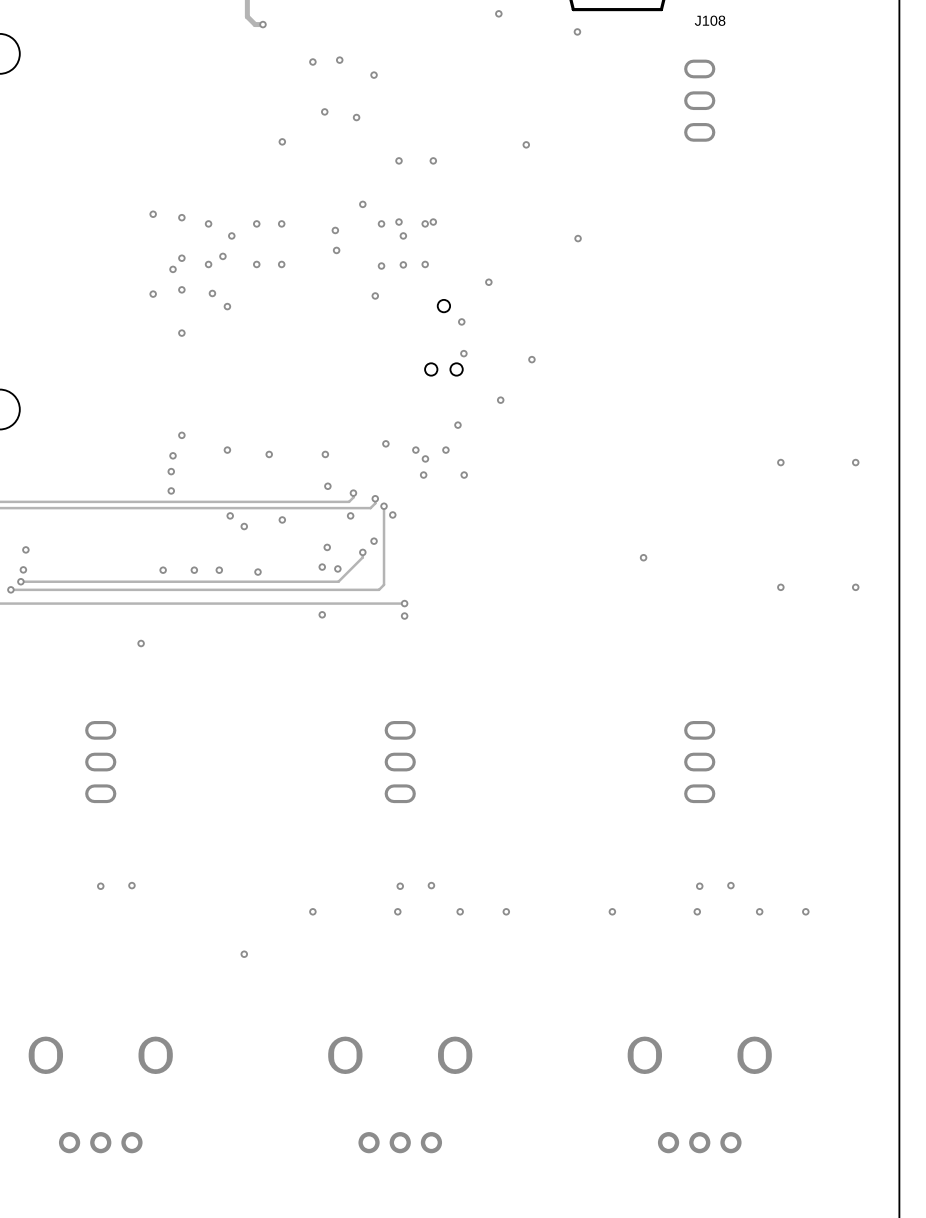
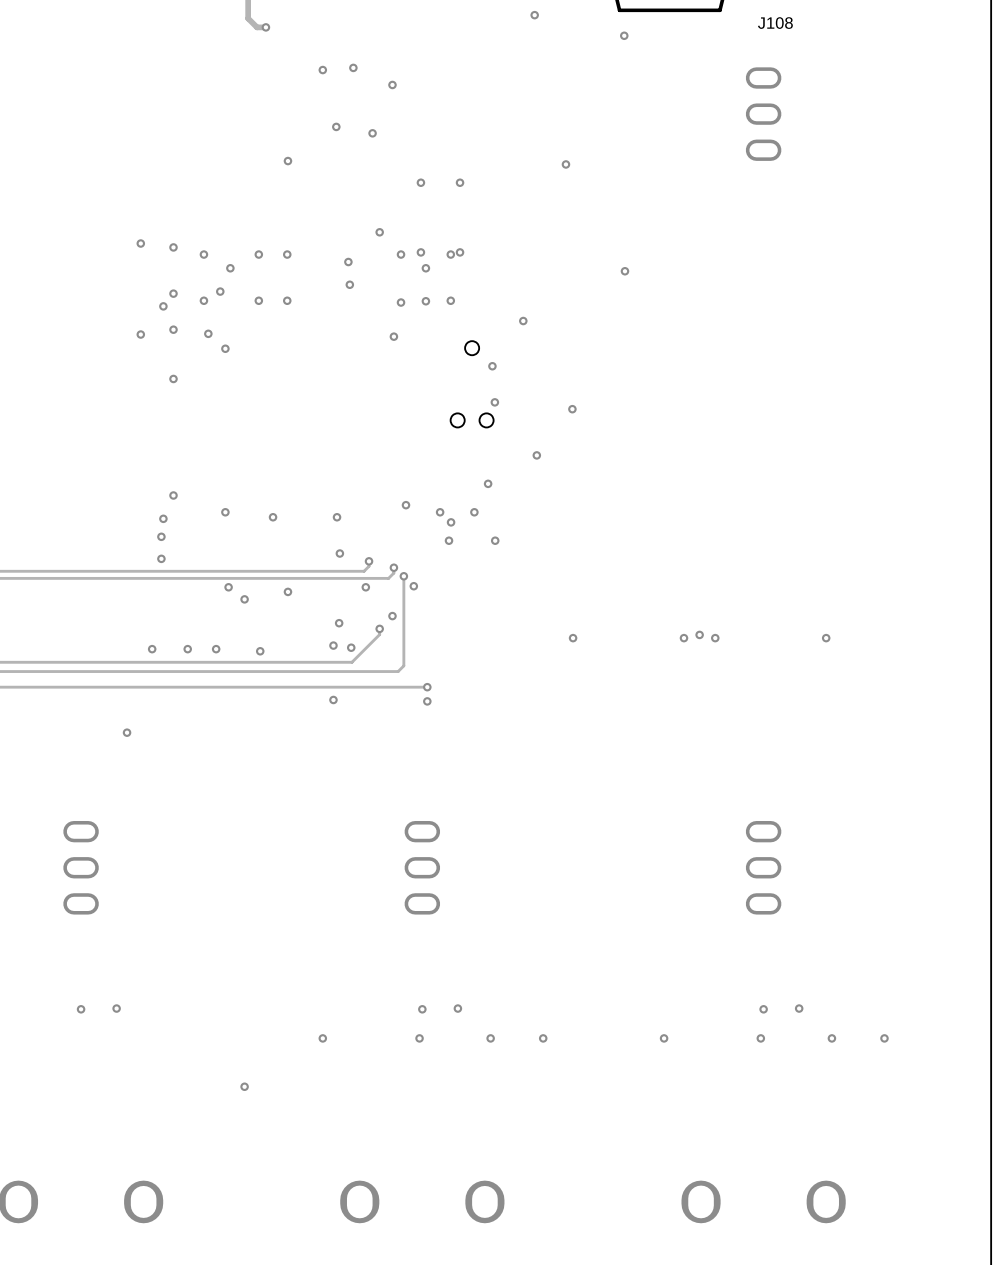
via: (780, 462) -> none
via: (855, 462) -> none
via: none -> (573, 638)
via: none -> (683, 638)
via: none -> (715, 638)
via position: (780, 587) -> (826, 638)
via: (855, 587) -> none

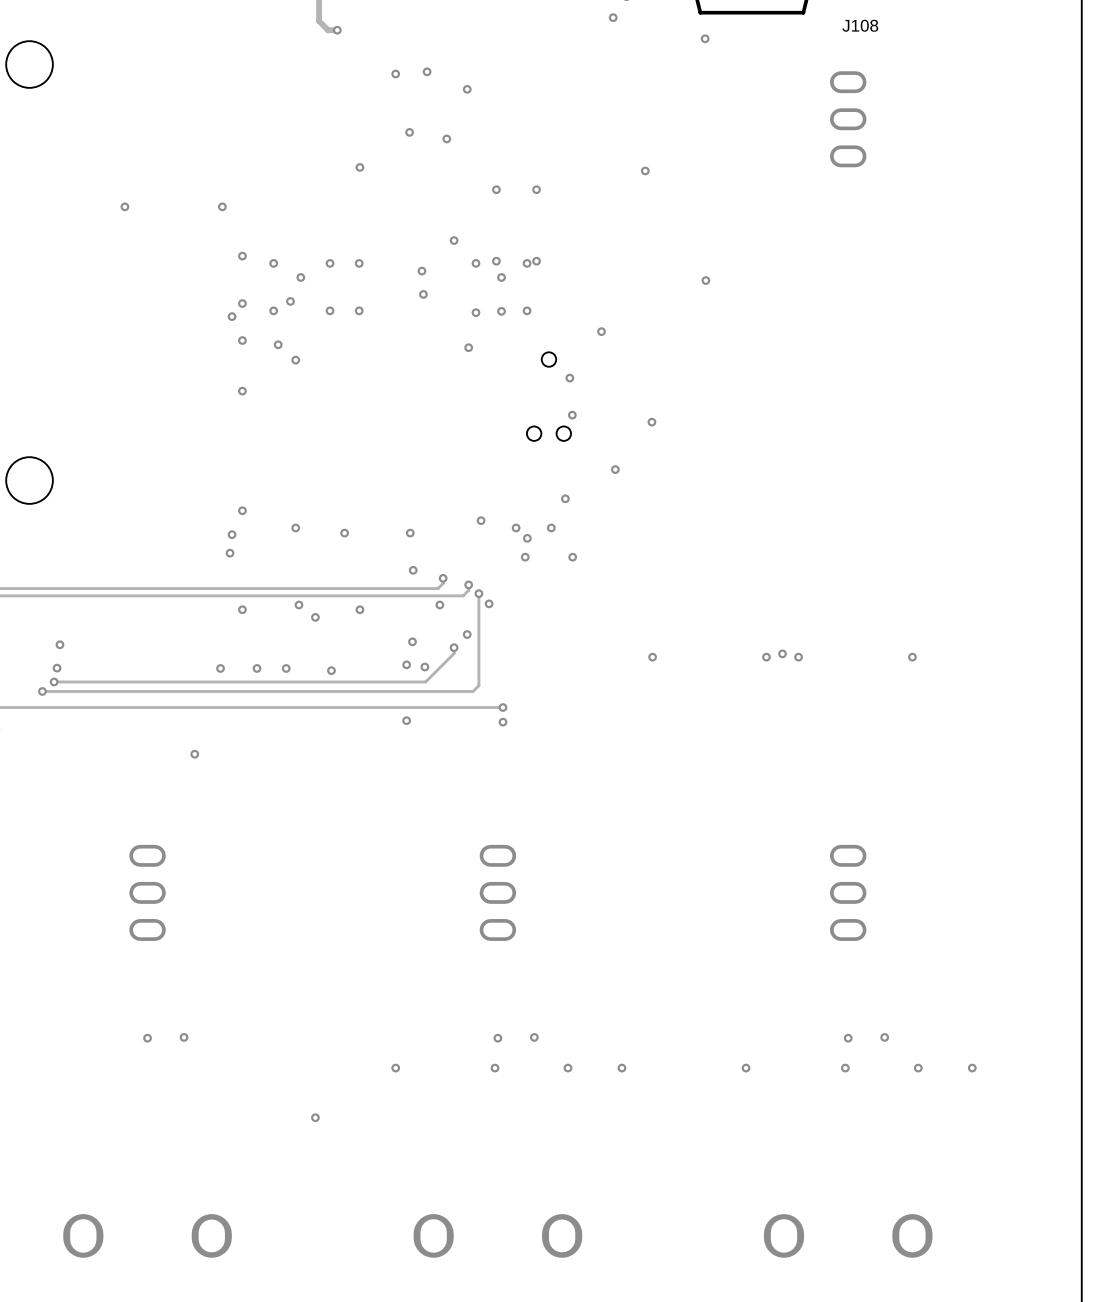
via: none -> (124, 206)
via position: (140, 243) -> (222, 206)
via: (140, 334) -> none
via position: (161, 558) -> (242, 609)

